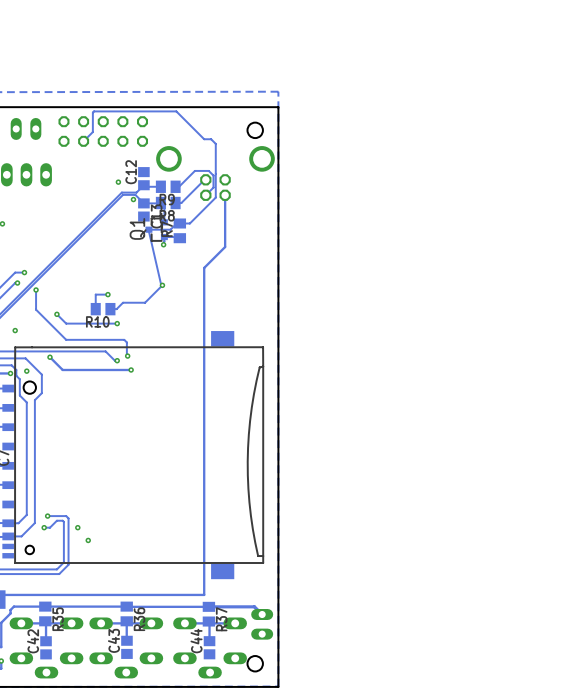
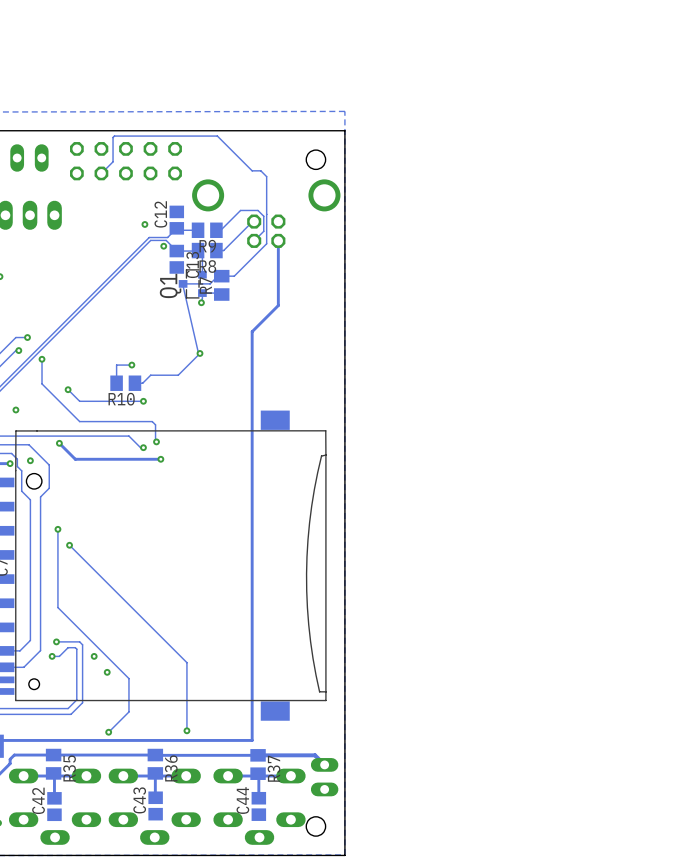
track: none -> (57, 529) (57, 607) (128, 678) (128, 711) (108, 732)
via: none -> (57, 529)
track: none -> (69, 545) (186, 662) (186, 730)
via: none -> (69, 545)
via: none -> (186, 730)
via: none -> (108, 732)

